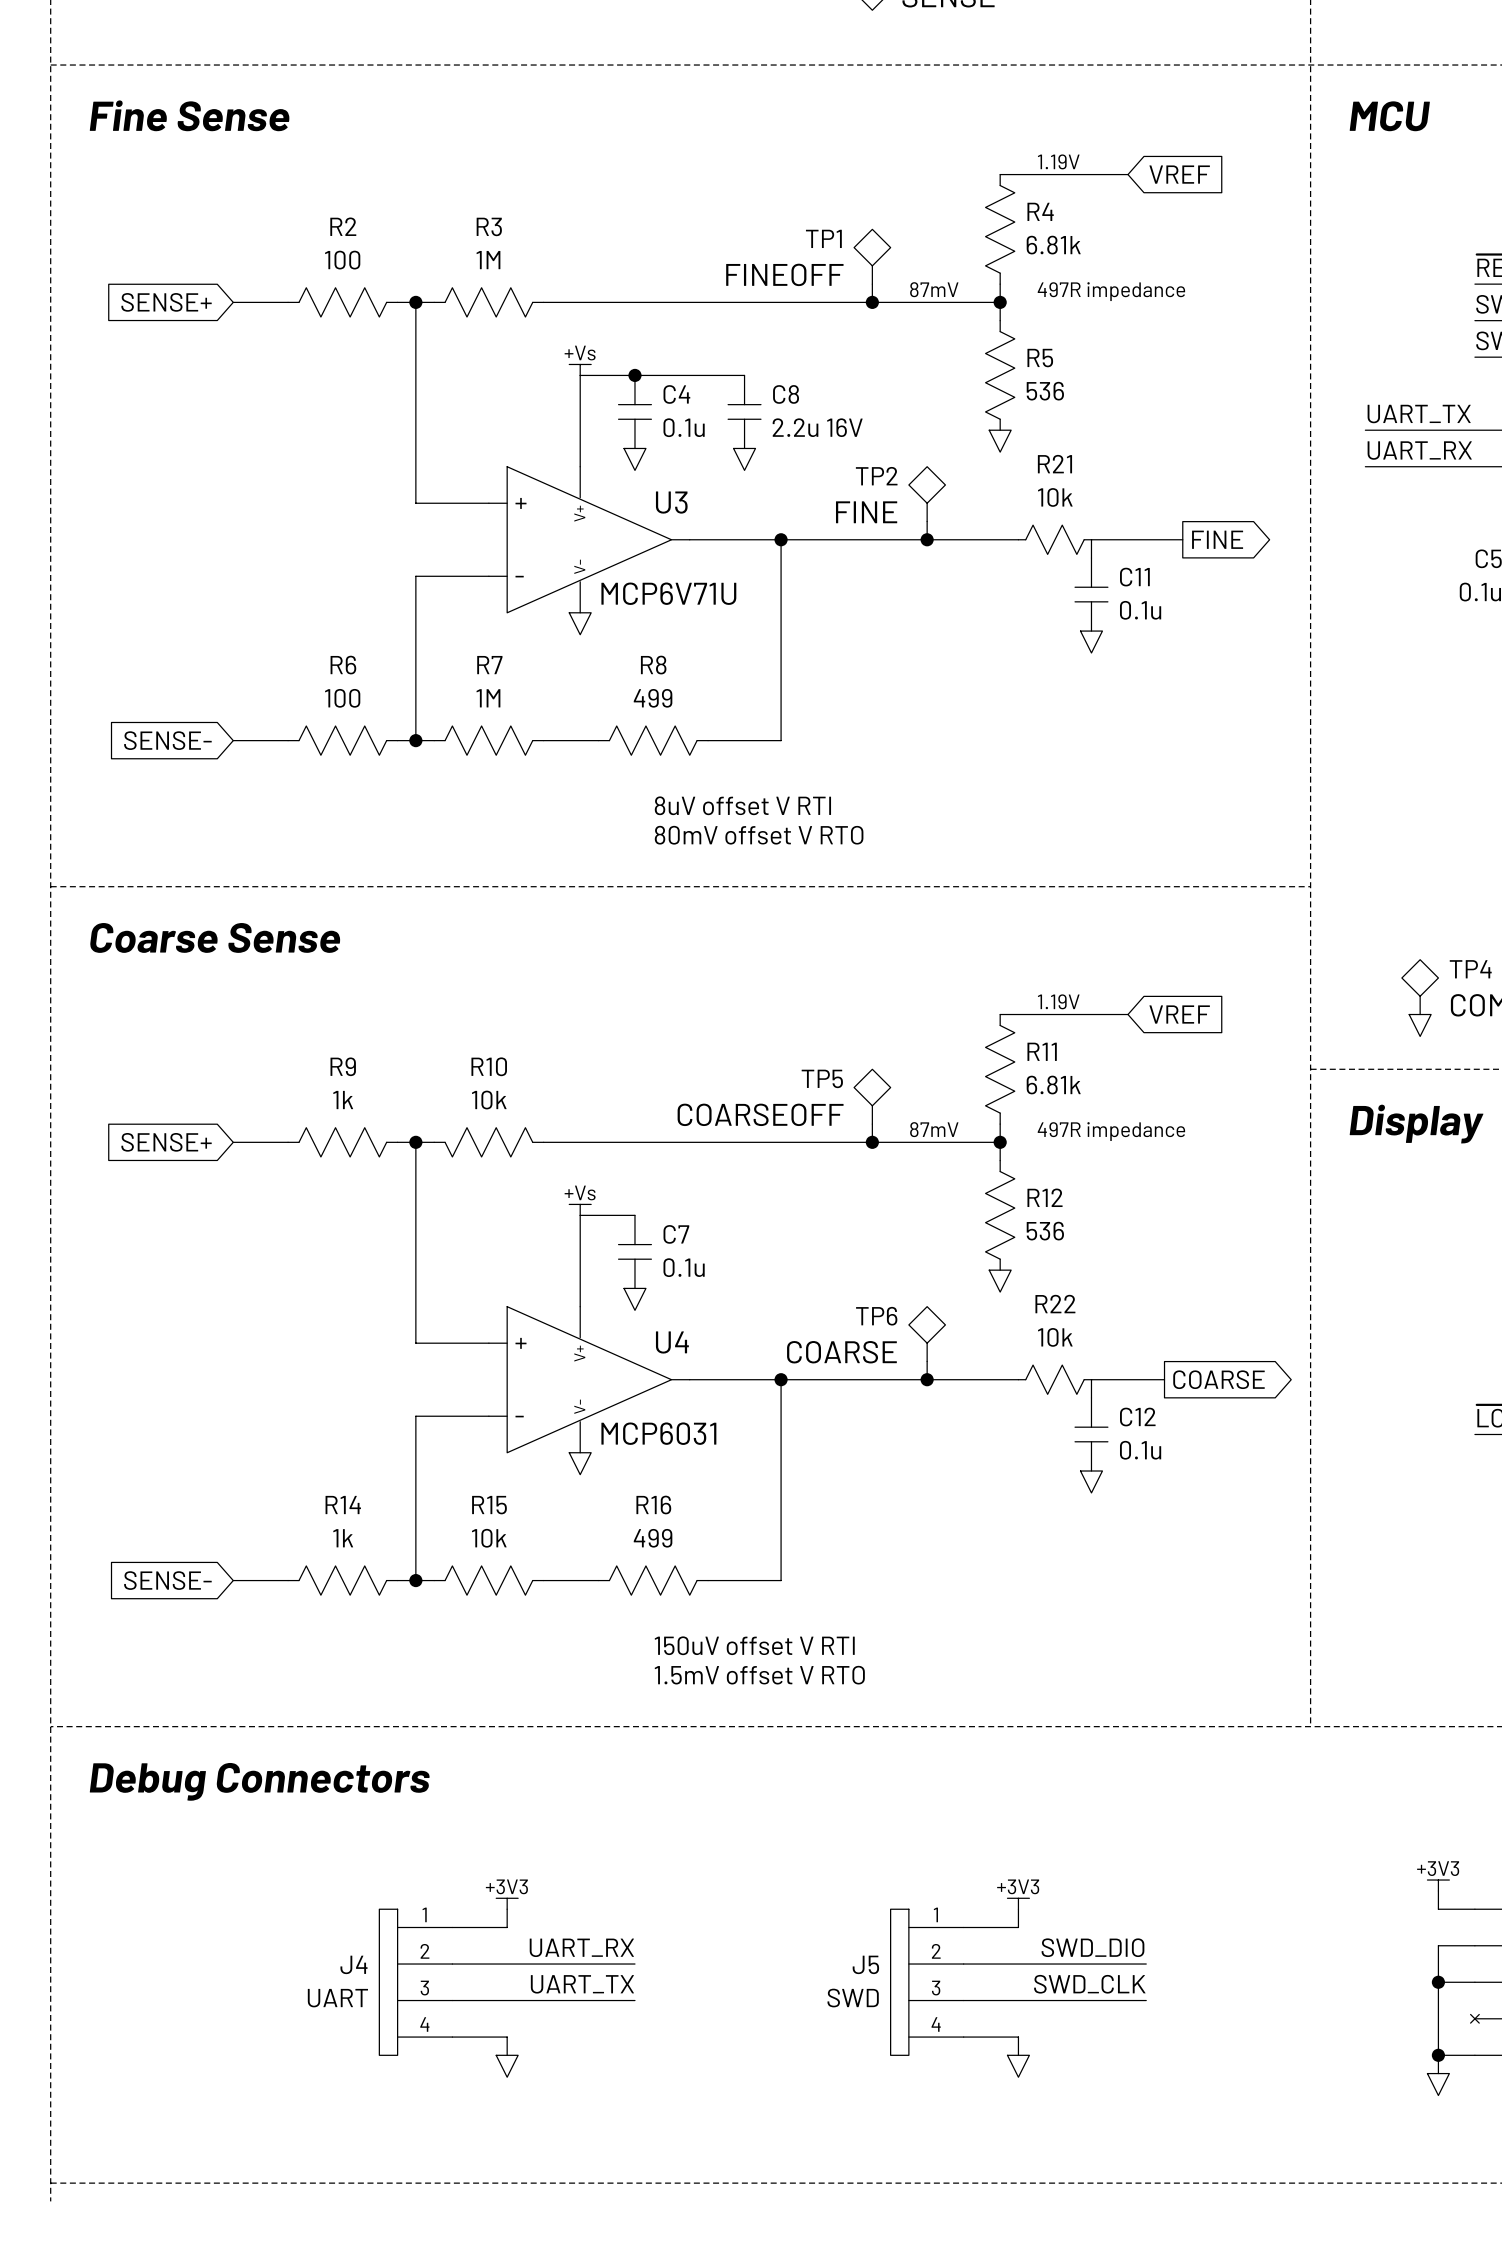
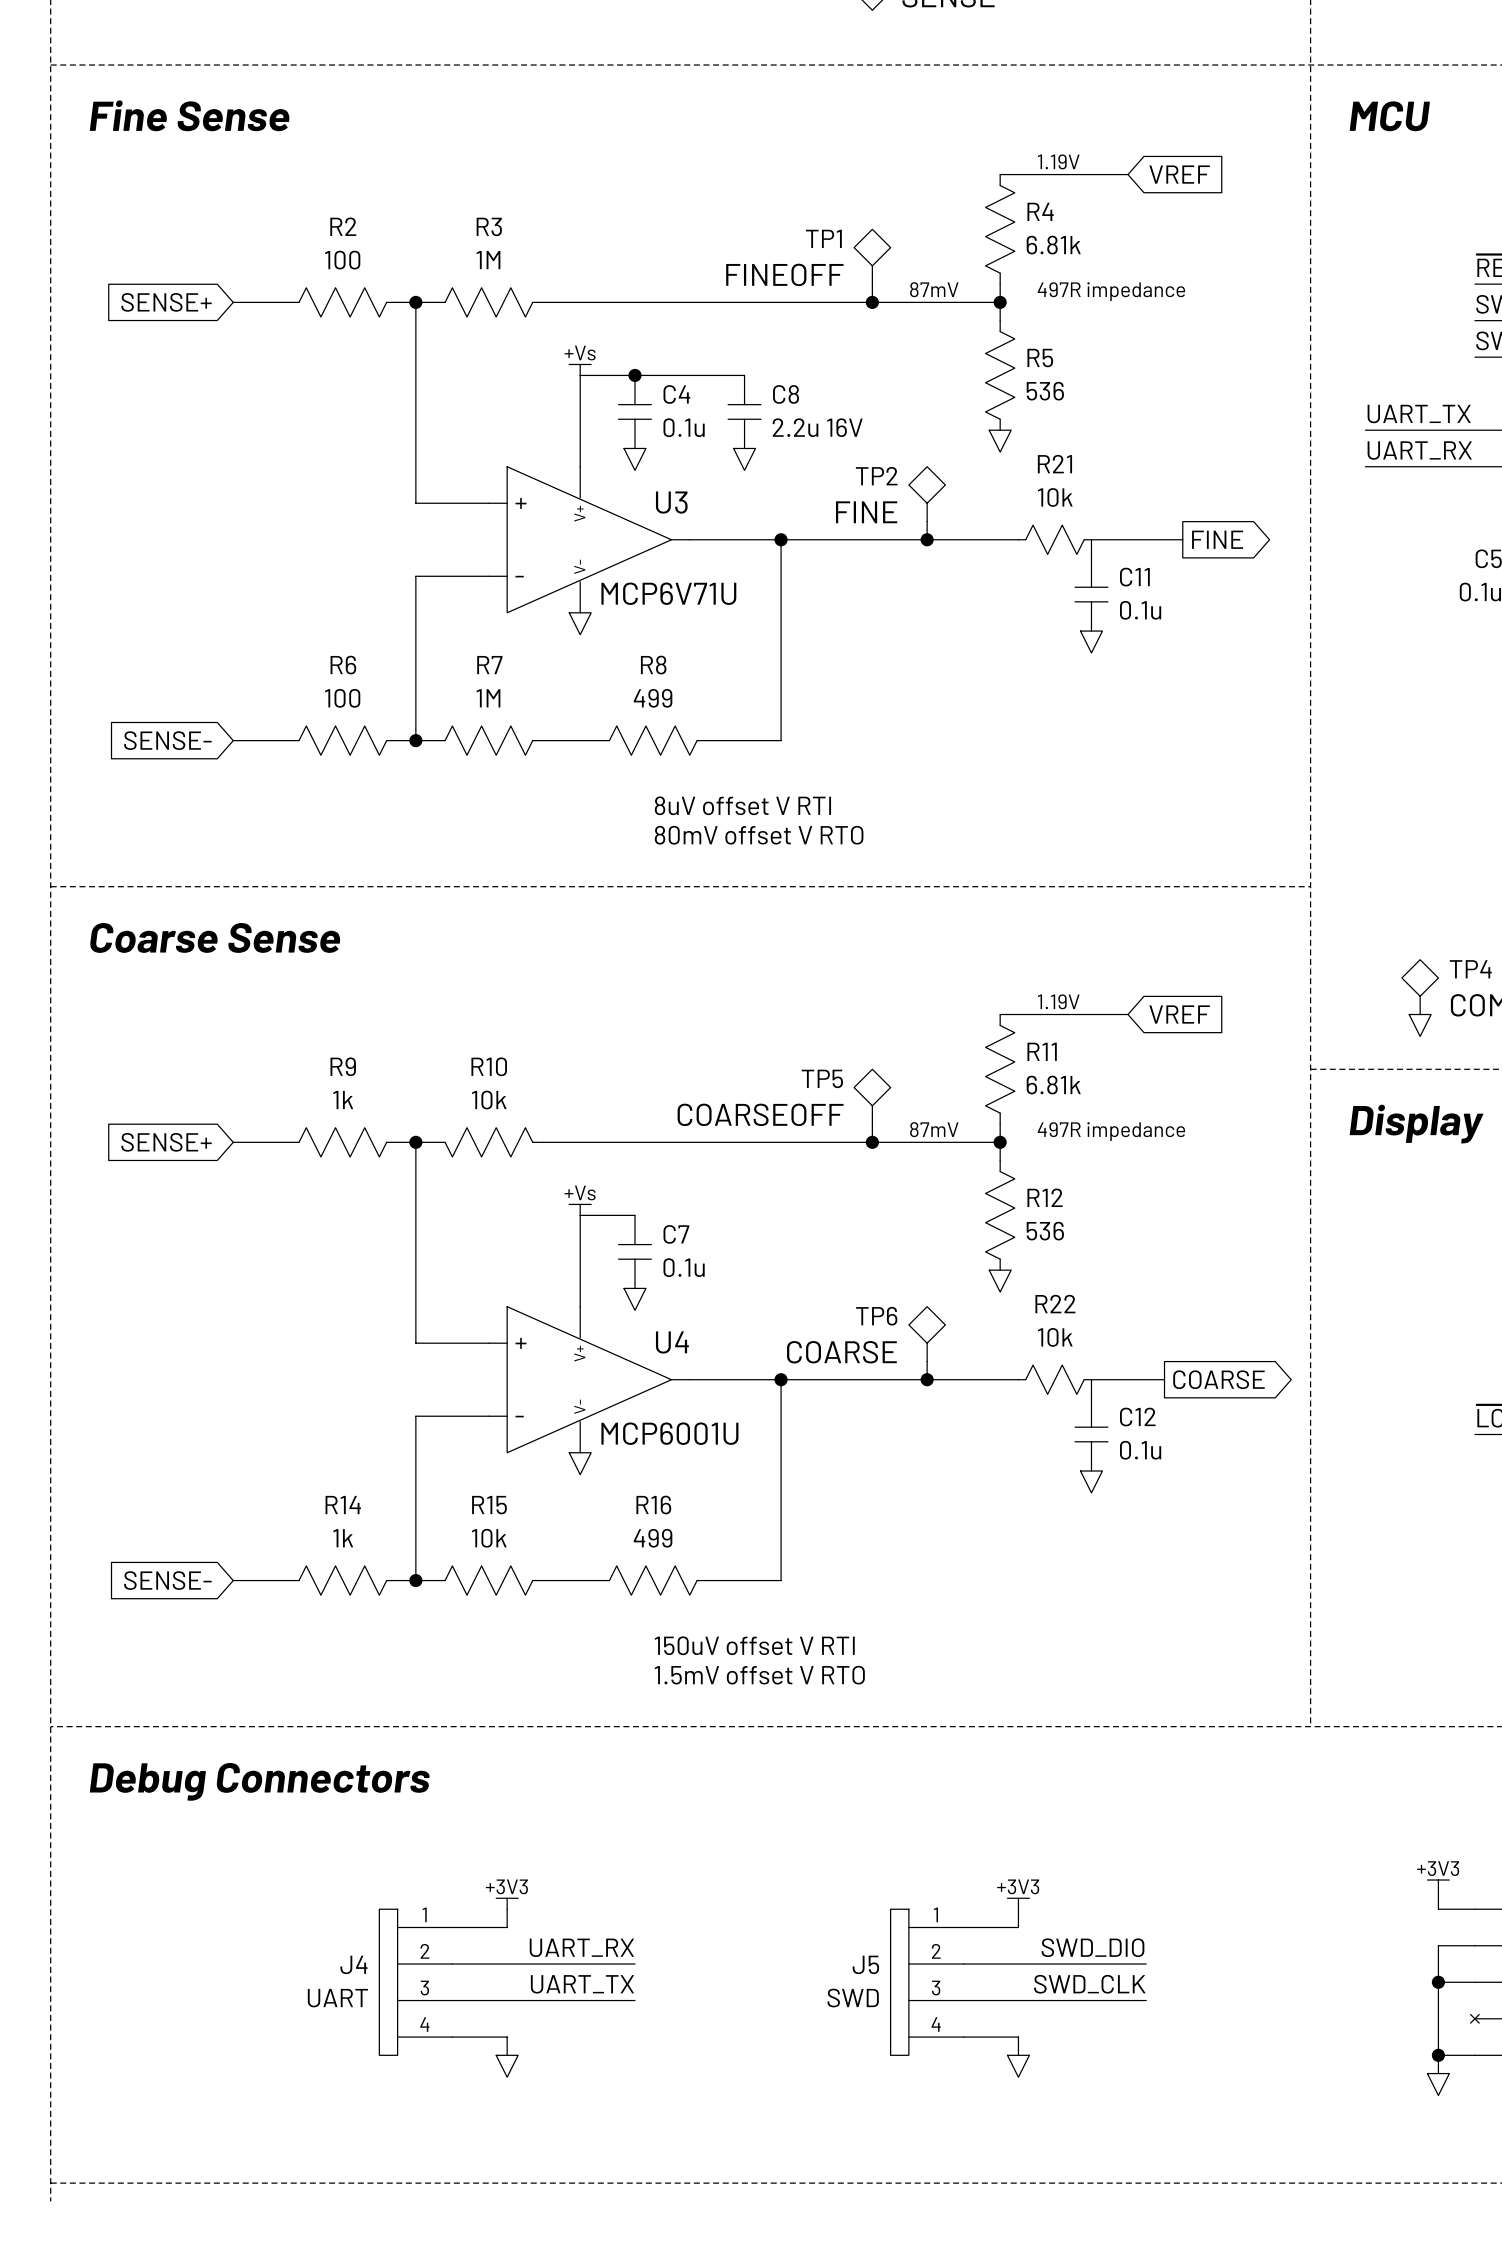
U4 value: MCP6031 (658, 1433) -> MCP6001U (669, 1433)

